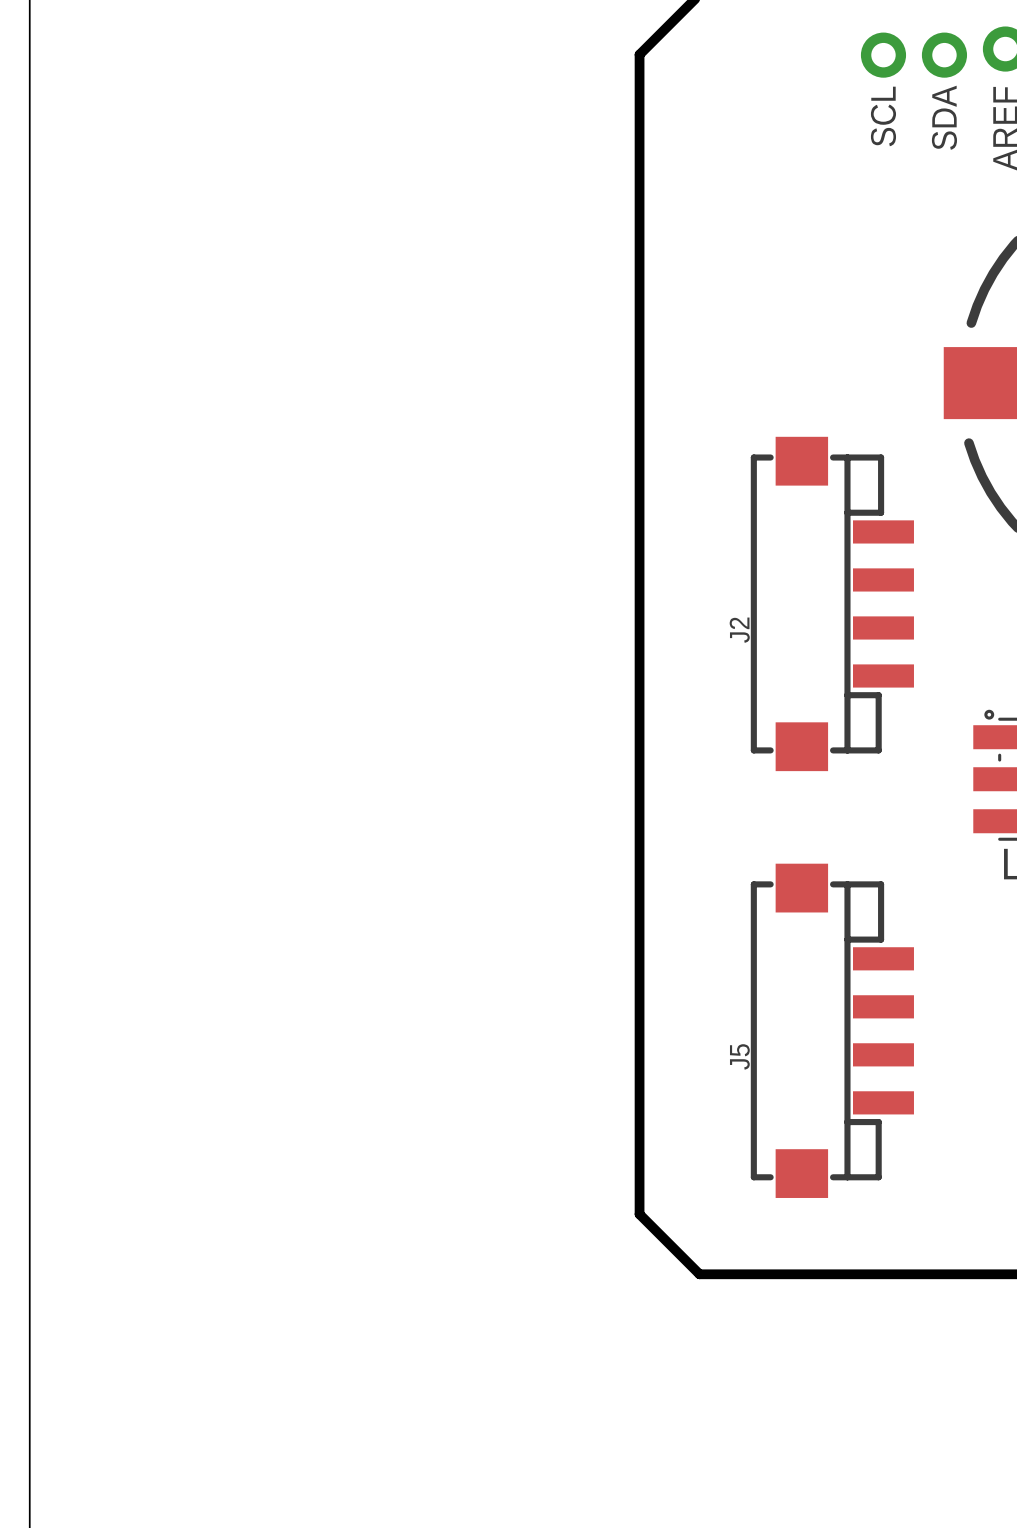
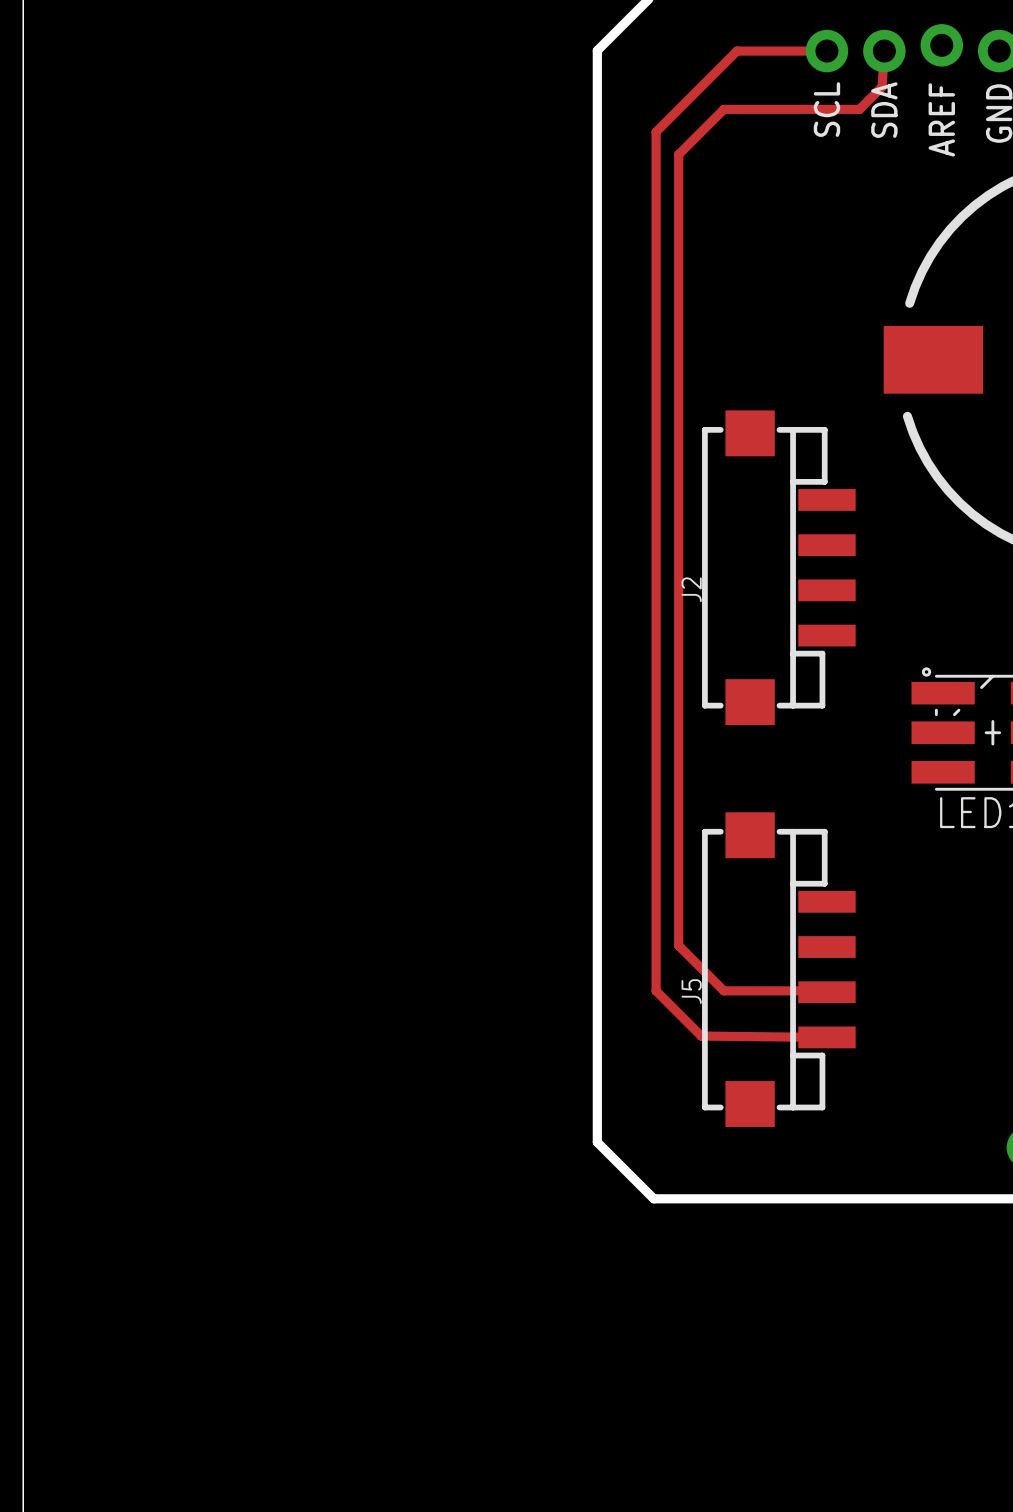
track: none -> (826, 51) (737, 51) (656, 131) (656, 990) (701, 1036) (826, 1037)
track: none -> (884, 51) (882, 86) (859, 109) (723, 109) (678, 154) (678, 945) (723, 990) (814, 990)

